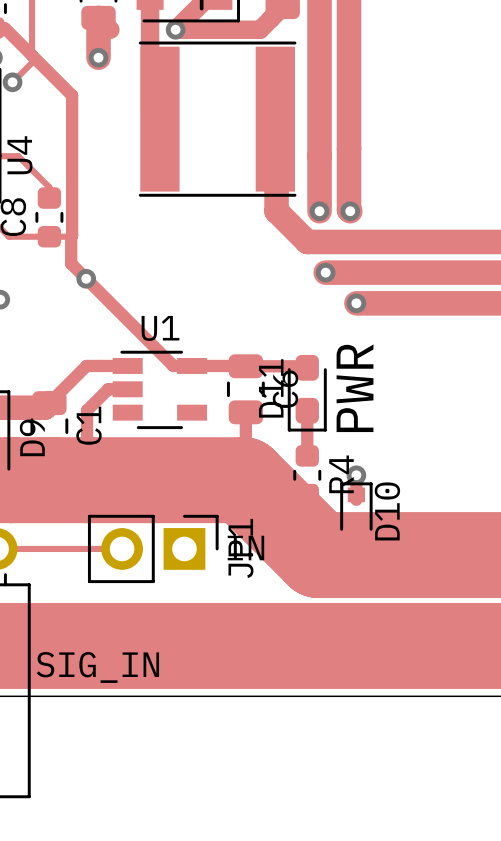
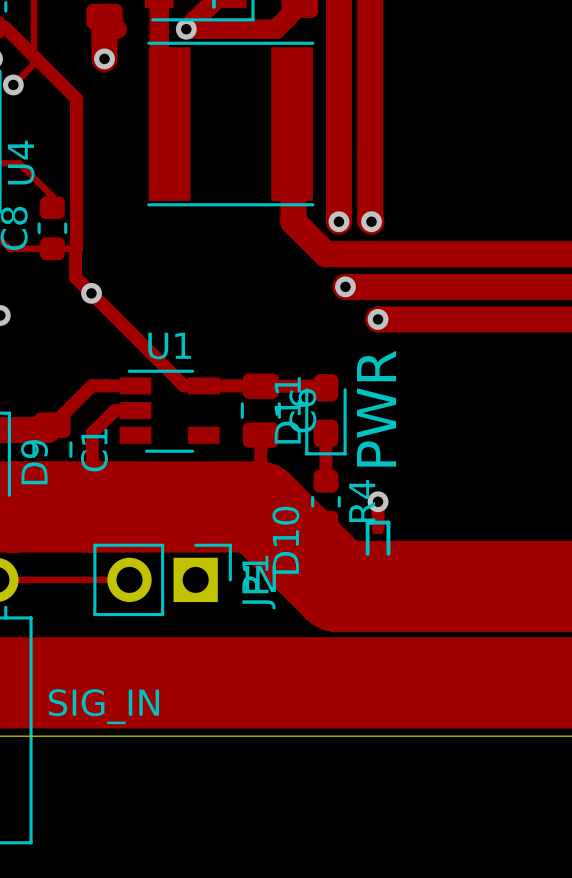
D10 footprint: [340, 482, 373, 537] -> [365, 520, 391, 557]
D10 name position: D10 (387, 511) -> D10 (285, 540)

